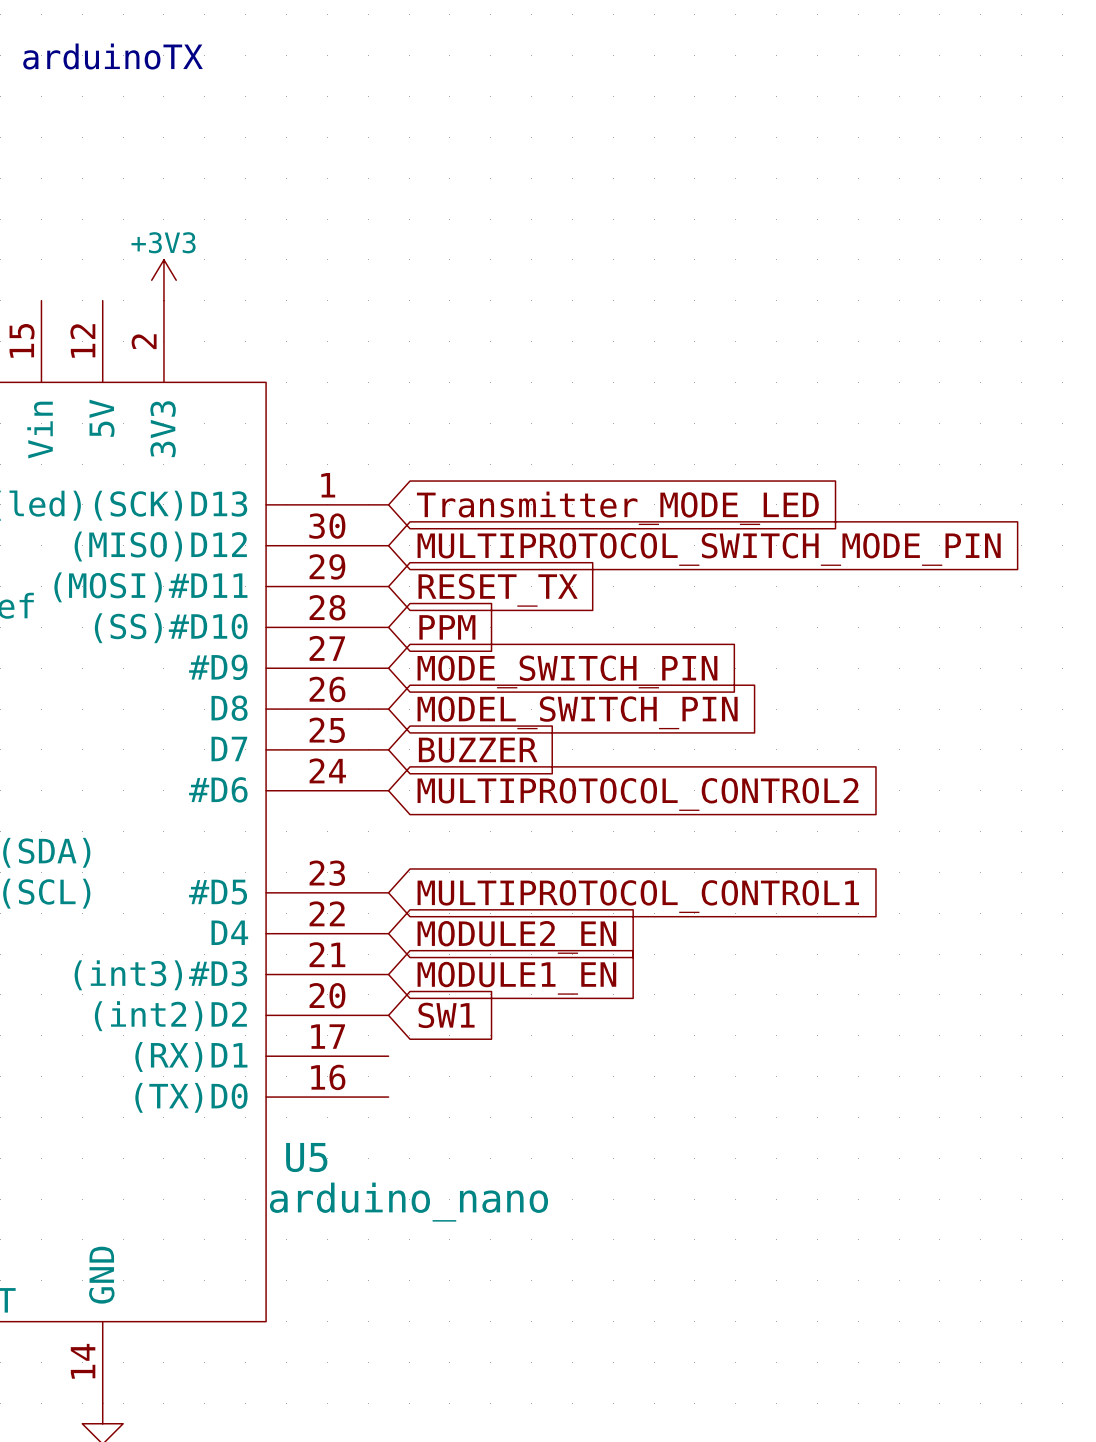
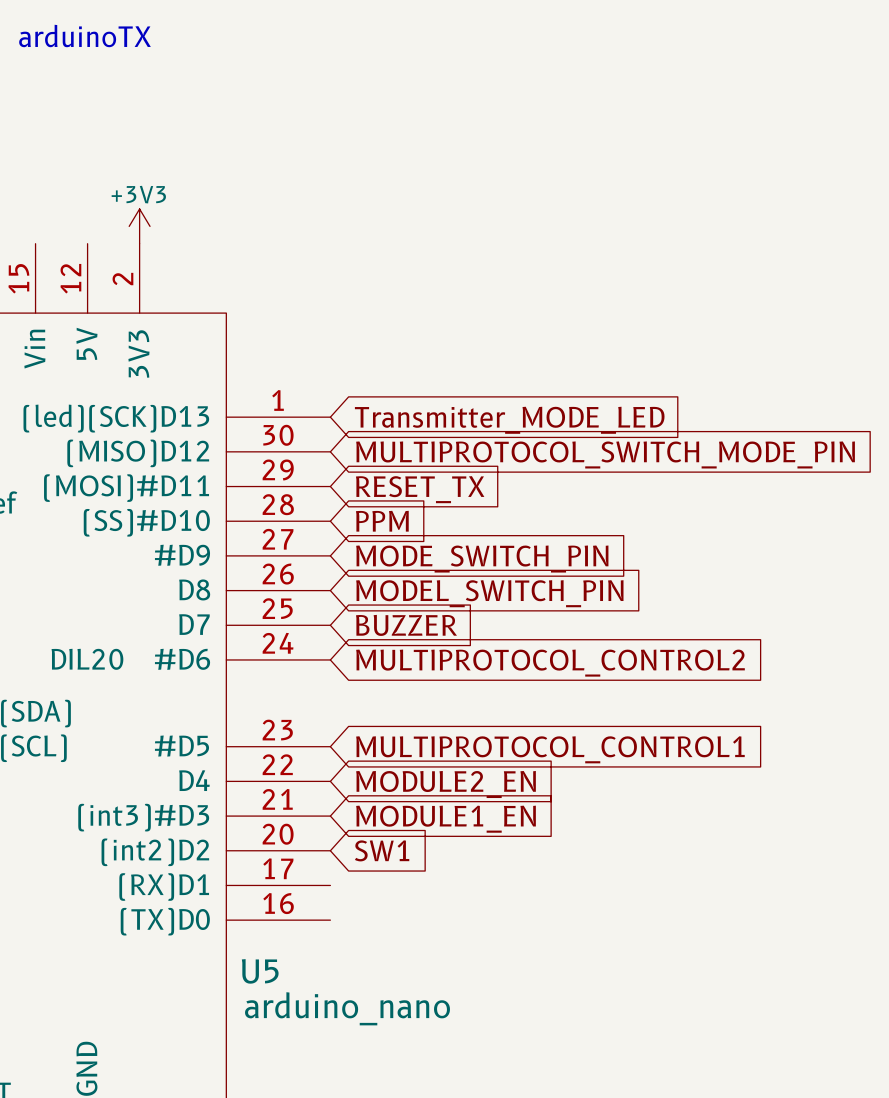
U5 text: none -> DIL20 (87, 659)

